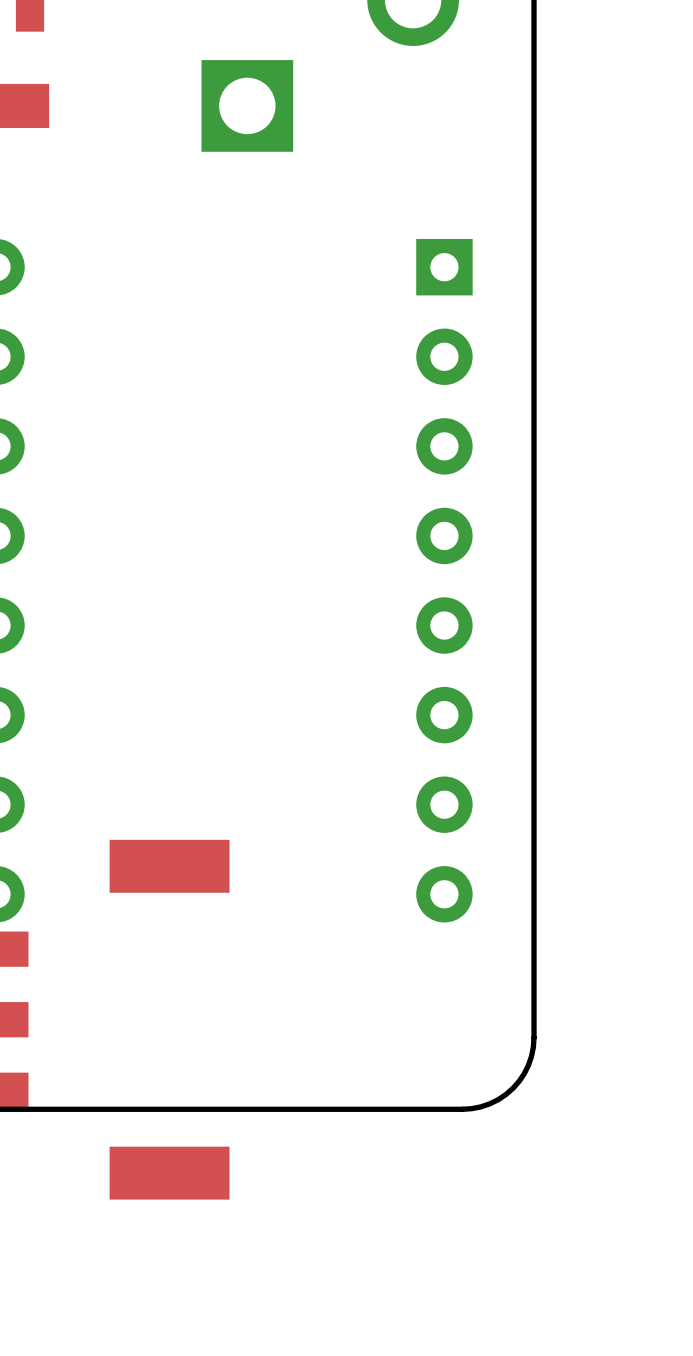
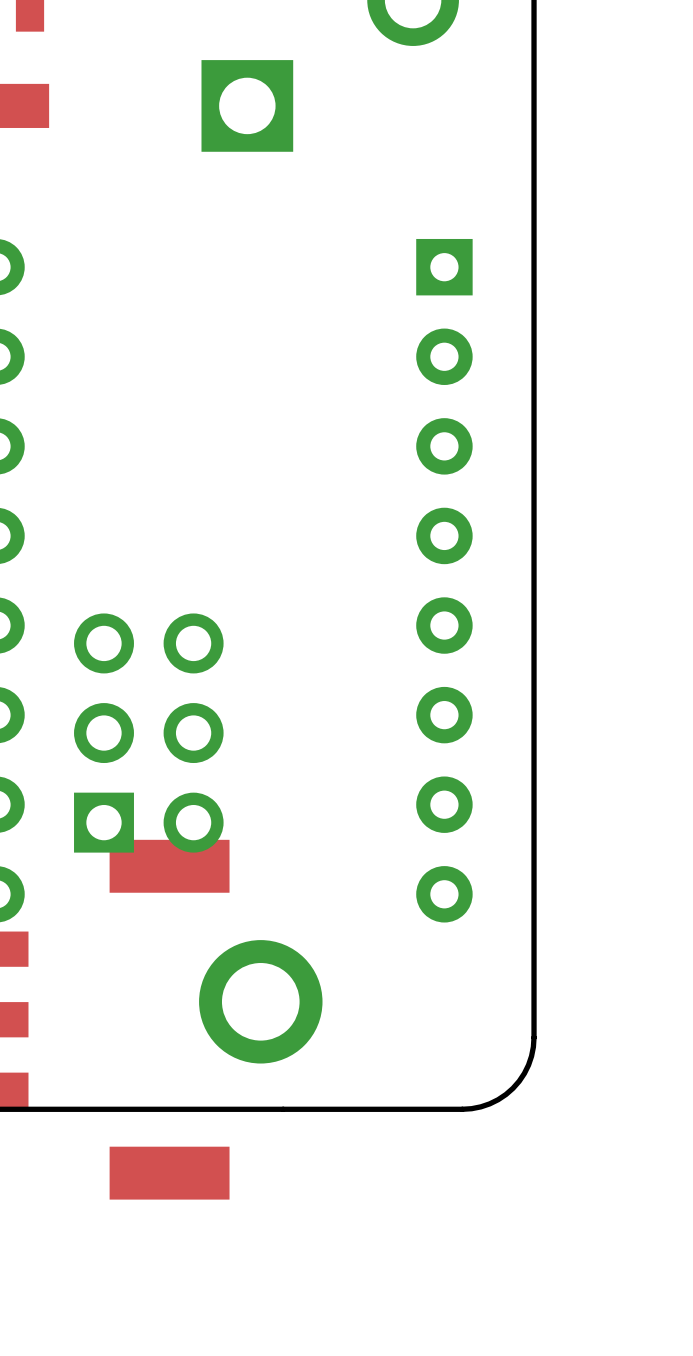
part: none -> (148, 733)
part: none -> (260, 1001)

